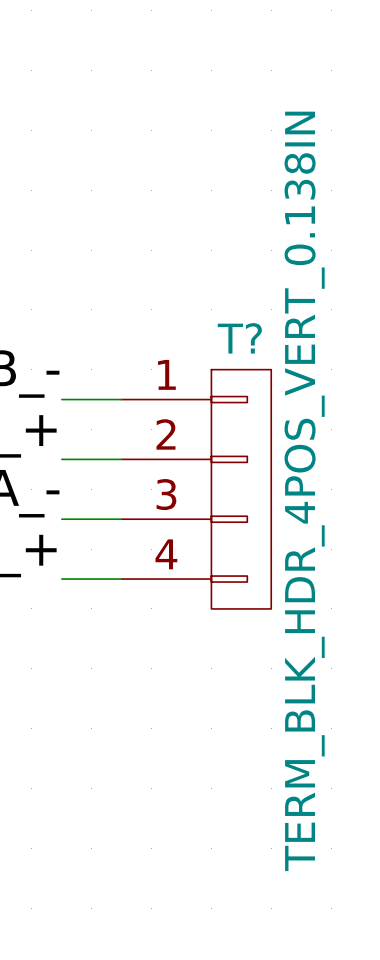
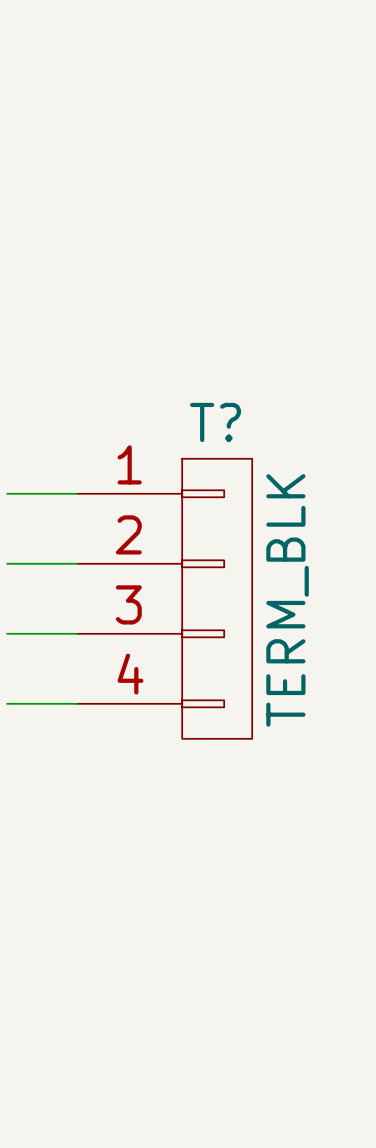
T? value: TERM_BLK_HDR_4POS_VERT_0.138IN (304, 491) -> TERM_BLK (287, 600)

